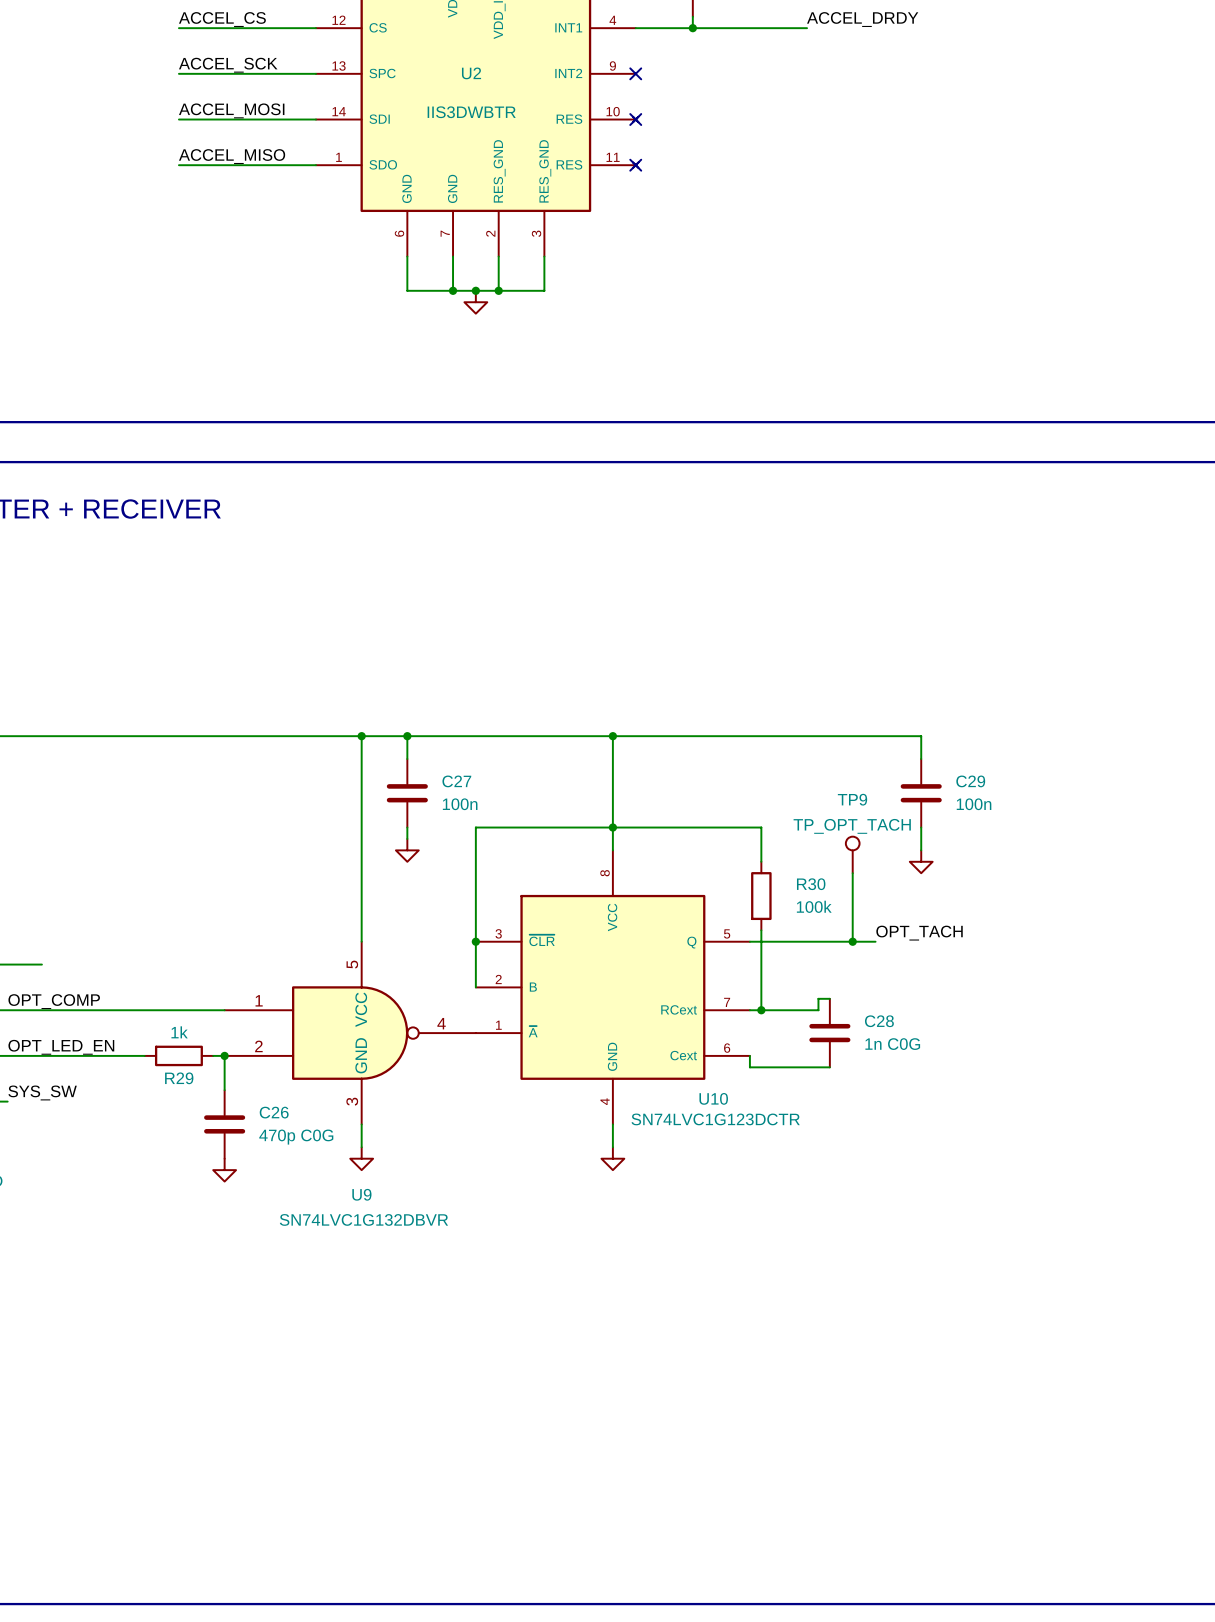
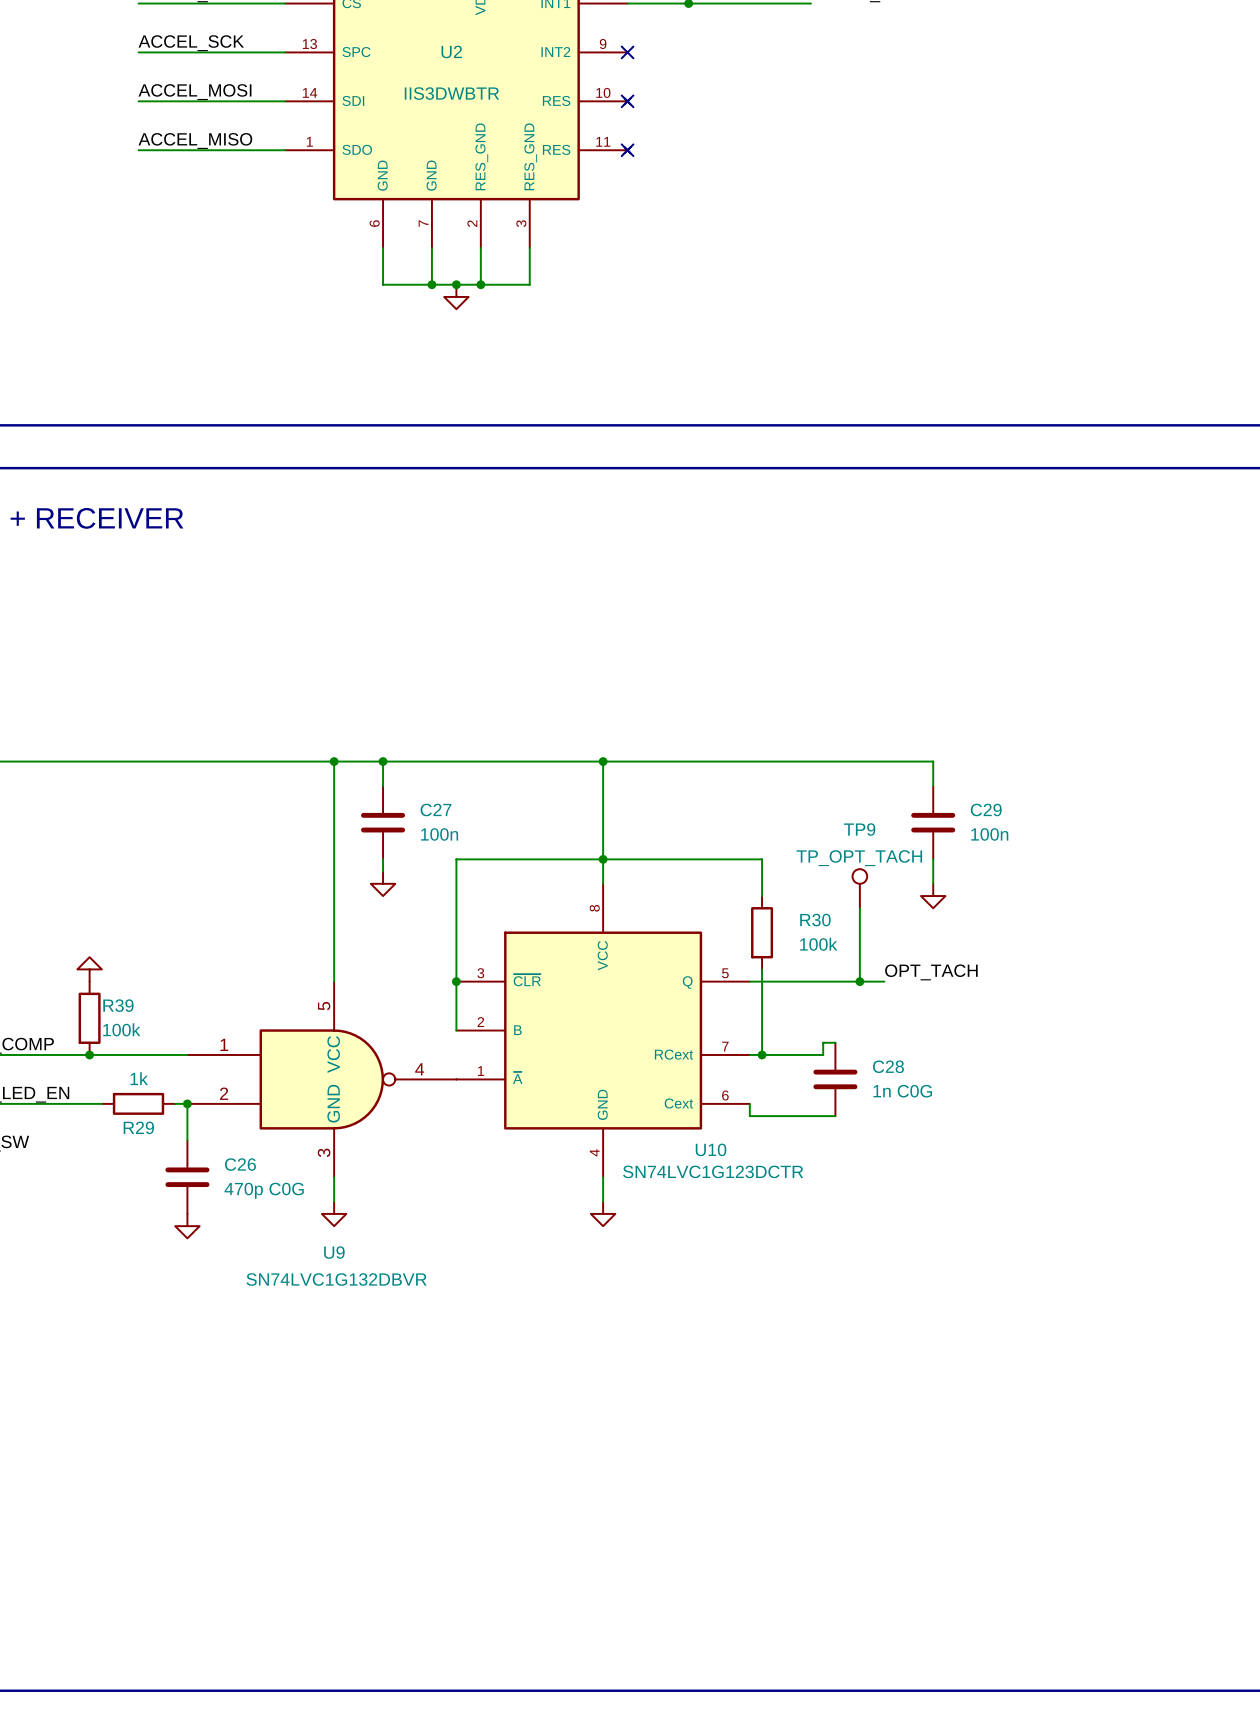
power symbol: none -> (89, 969)
R39: none -> 100k (89, 1018)
junction: none -> (89, 1054)

